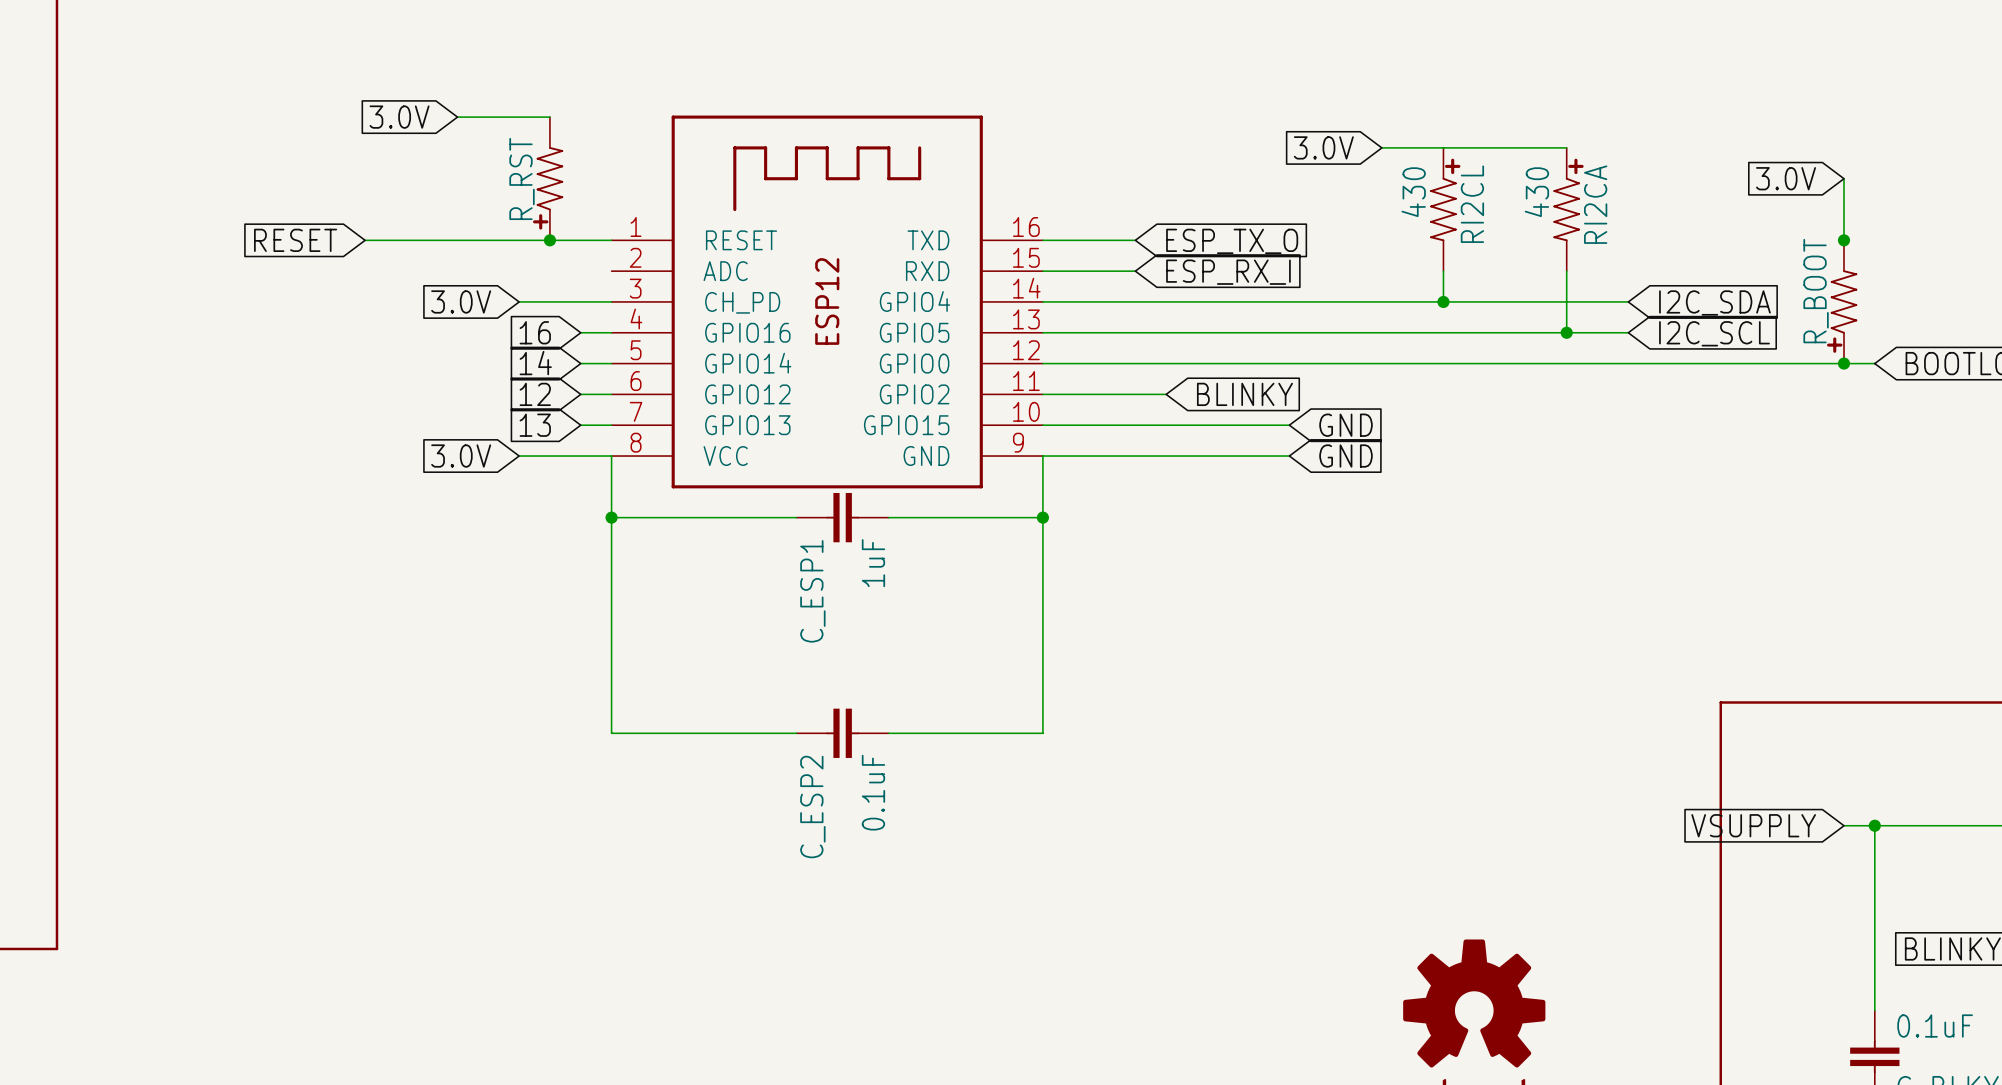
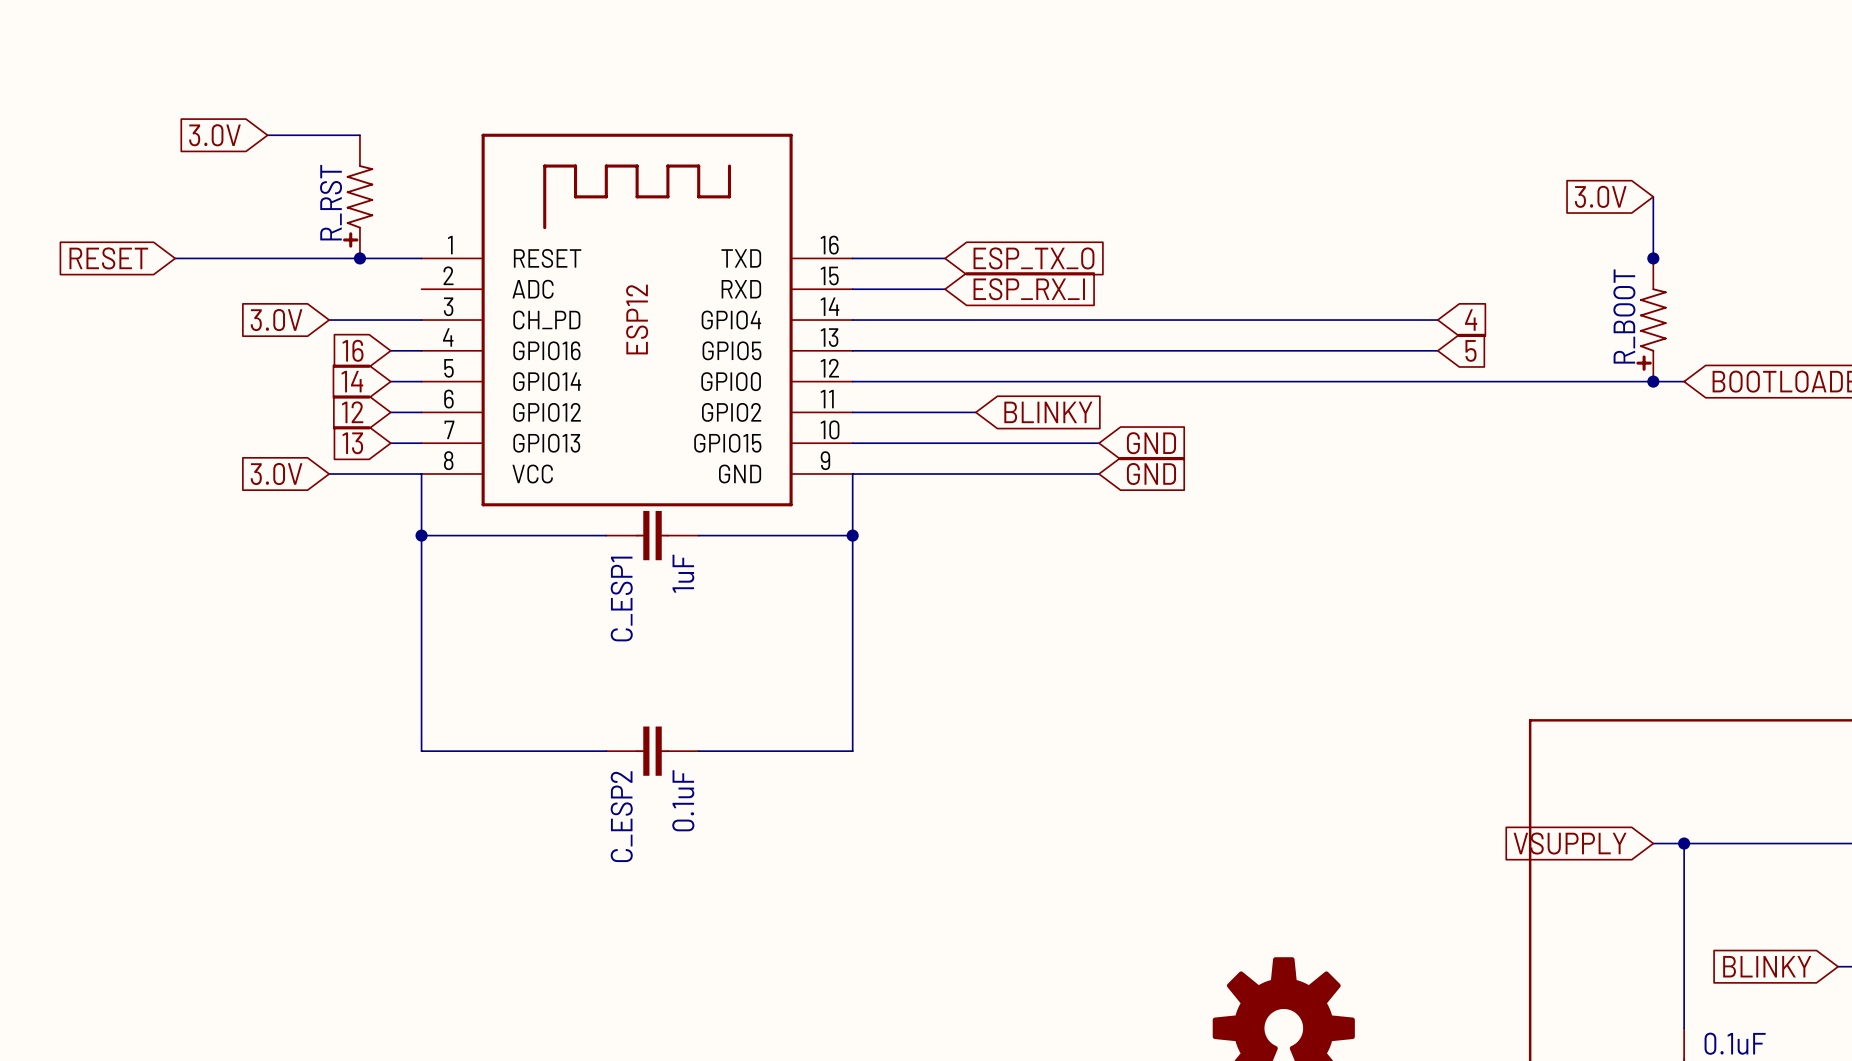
global label: 3.0V (1323, 147) -> none
wire: (1381, 147) (1566, 147) -> none
RI2CL: 430 (1445, 209) -> none
RI2CA: 430 (1568, 209) -> none
wire: (1443, 271) (1443, 301) -> none
wire: (1566, 271) (1566, 332) -> none
junction: (1443, 301) -> none
global label: I2C_SDA (1714, 302) -> 4 (1471, 320)
junction: (1566, 332) -> none
global label: I2C_SCL (1714, 333) -> 5 (1470, 350)

